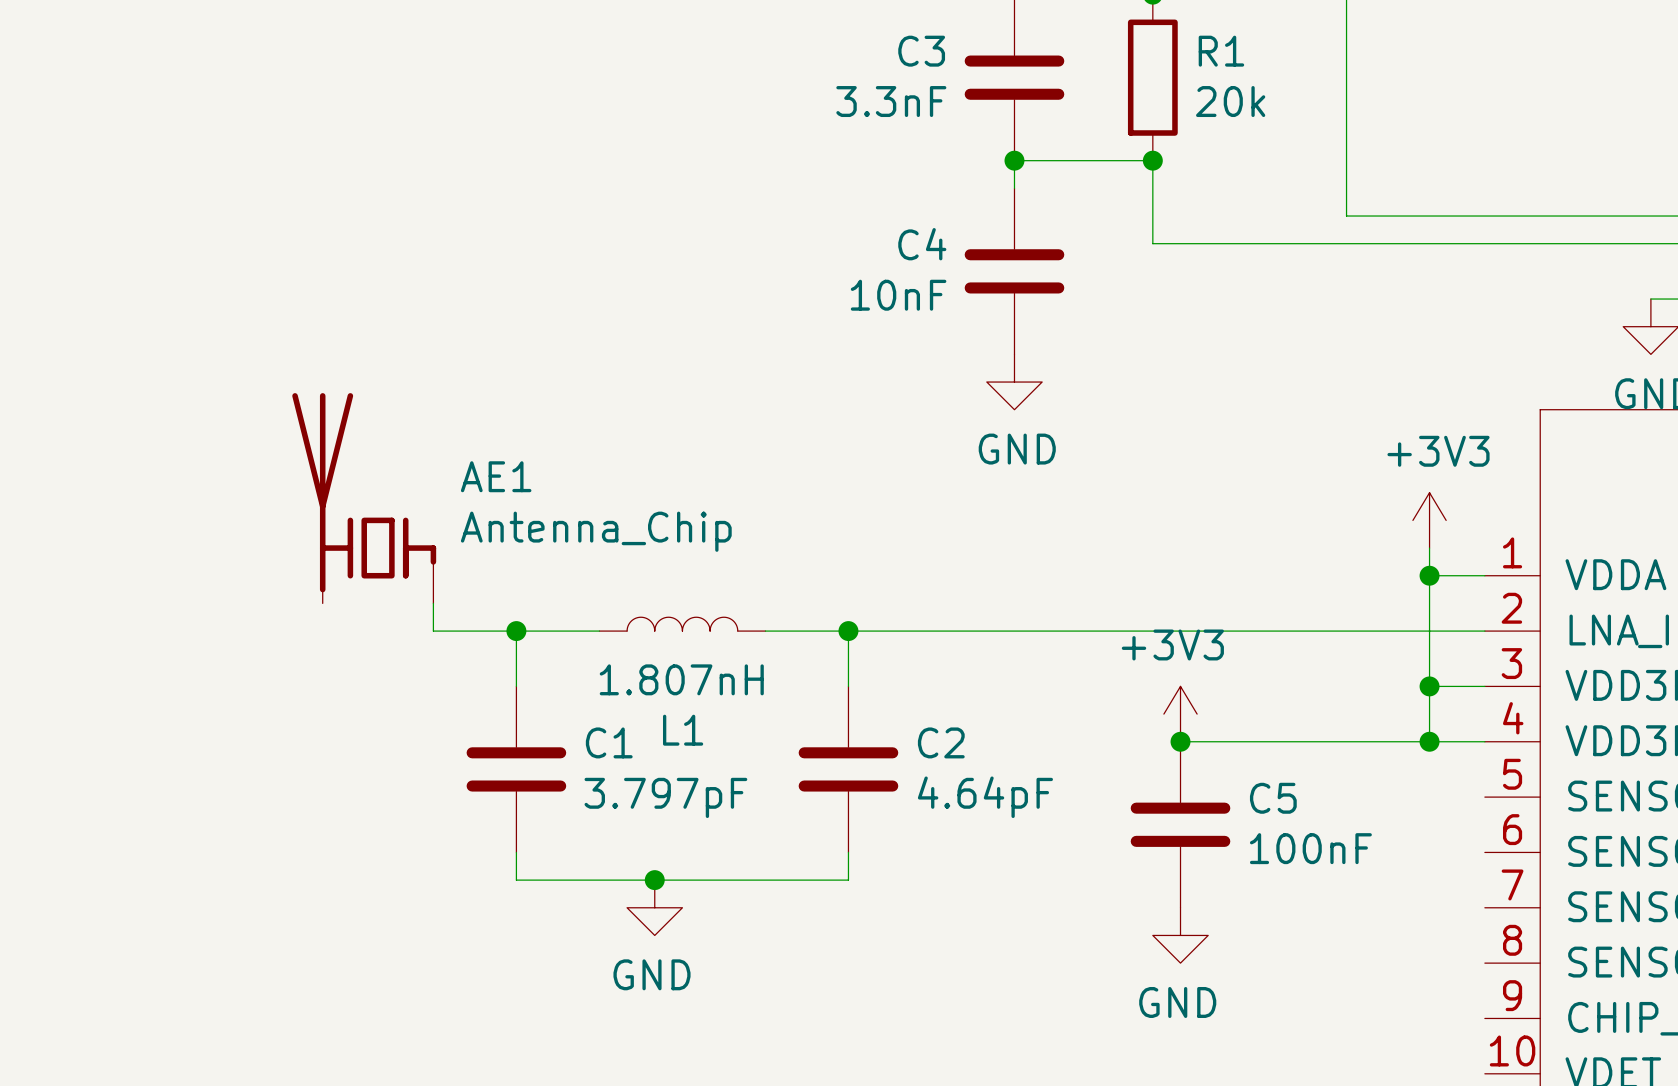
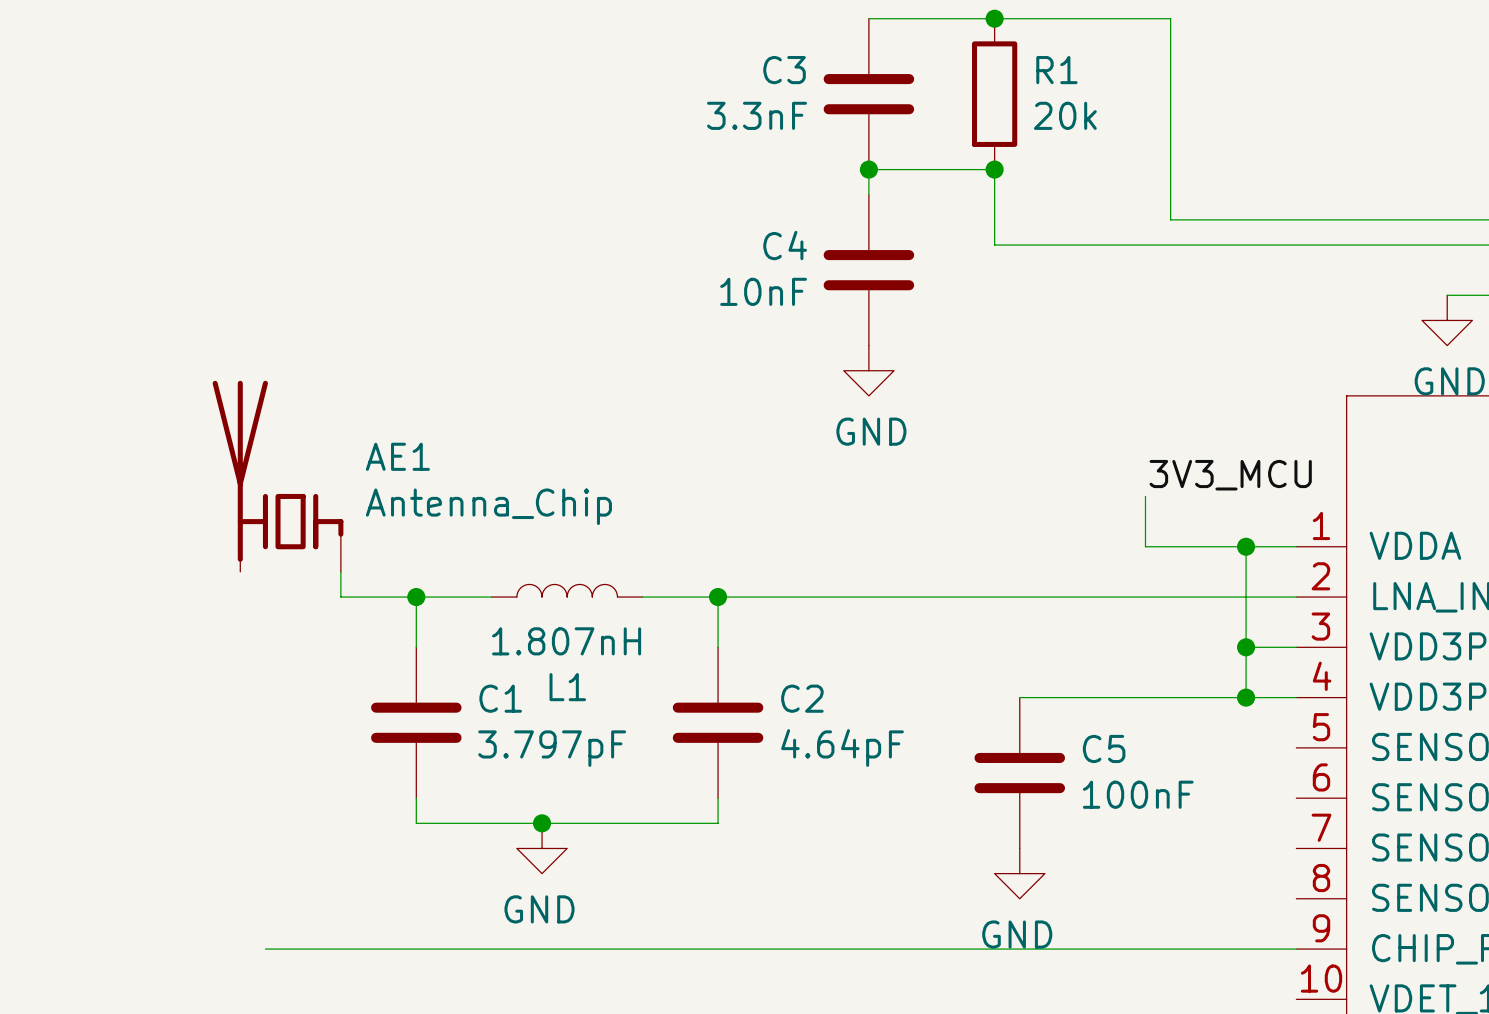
label: none -> 3V3_MCU (1230, 475)
power symbol: +3V3 (1429, 520) -> none
wire: (1429, 548) (1429, 575) -> (1145, 496) (1145, 546) (1246, 546)
power symbol: +3V3 (1180, 714) -> none
junction: (1180, 741) -> none
wire: none -> (265, 949) (1296, 949)

